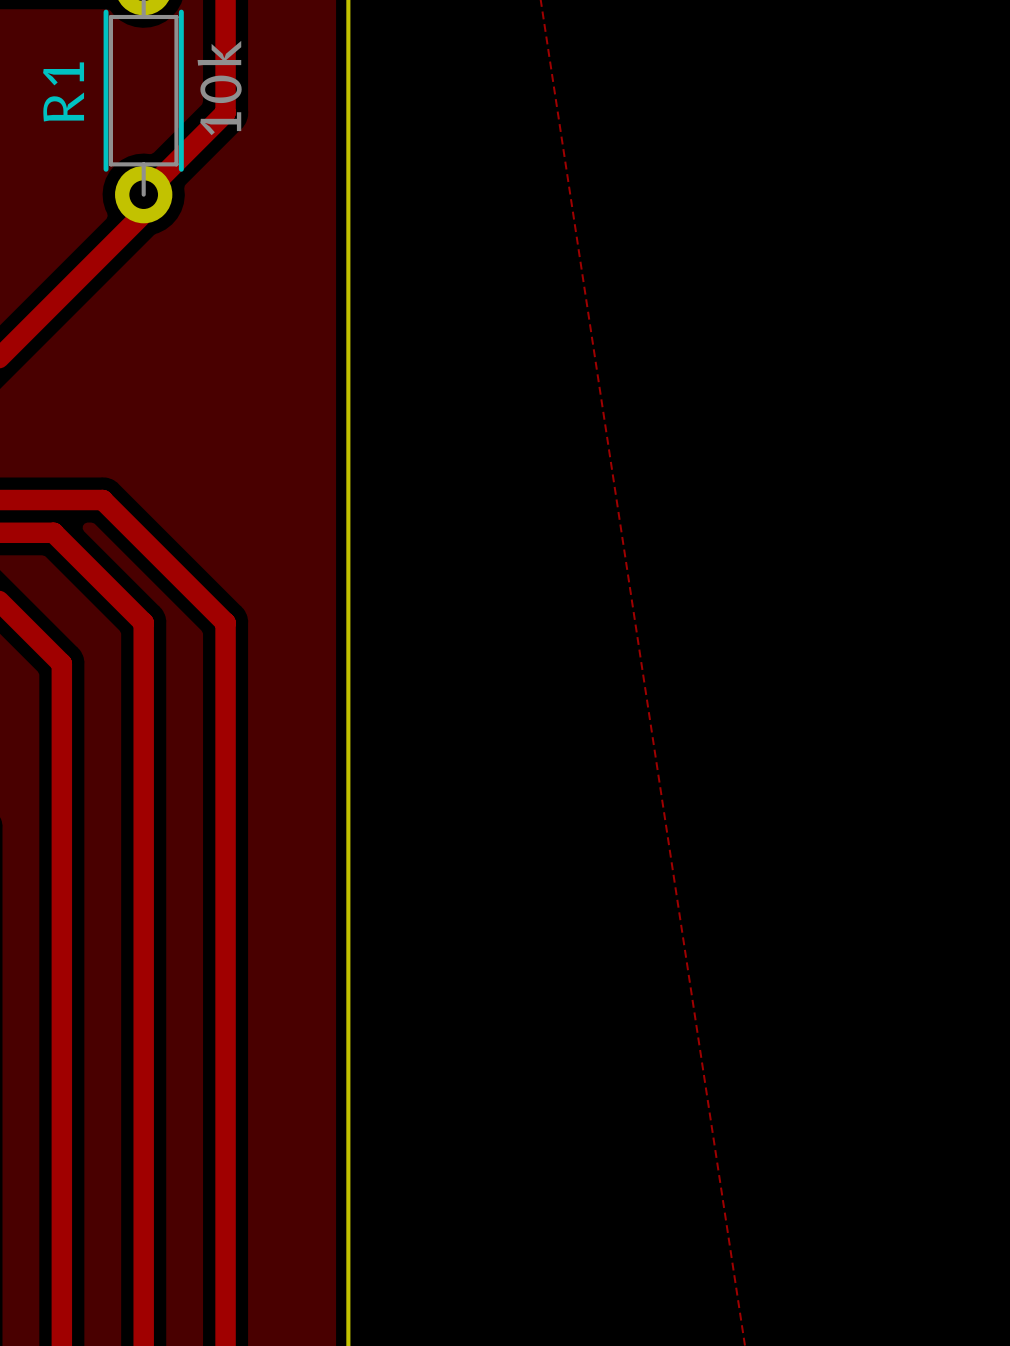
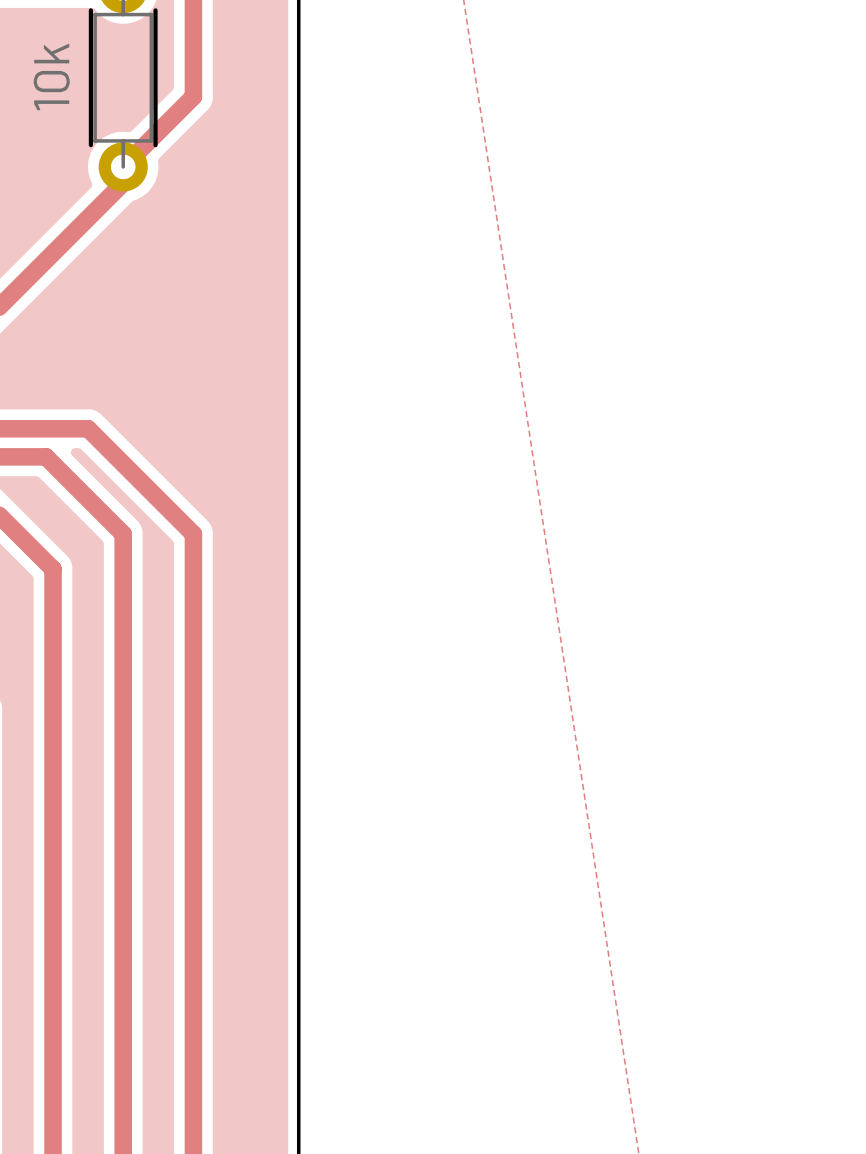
R1 value position: 10k (219, 88) -> 10k (51, 77)
R1 name: R1 (63, 91) -> none

